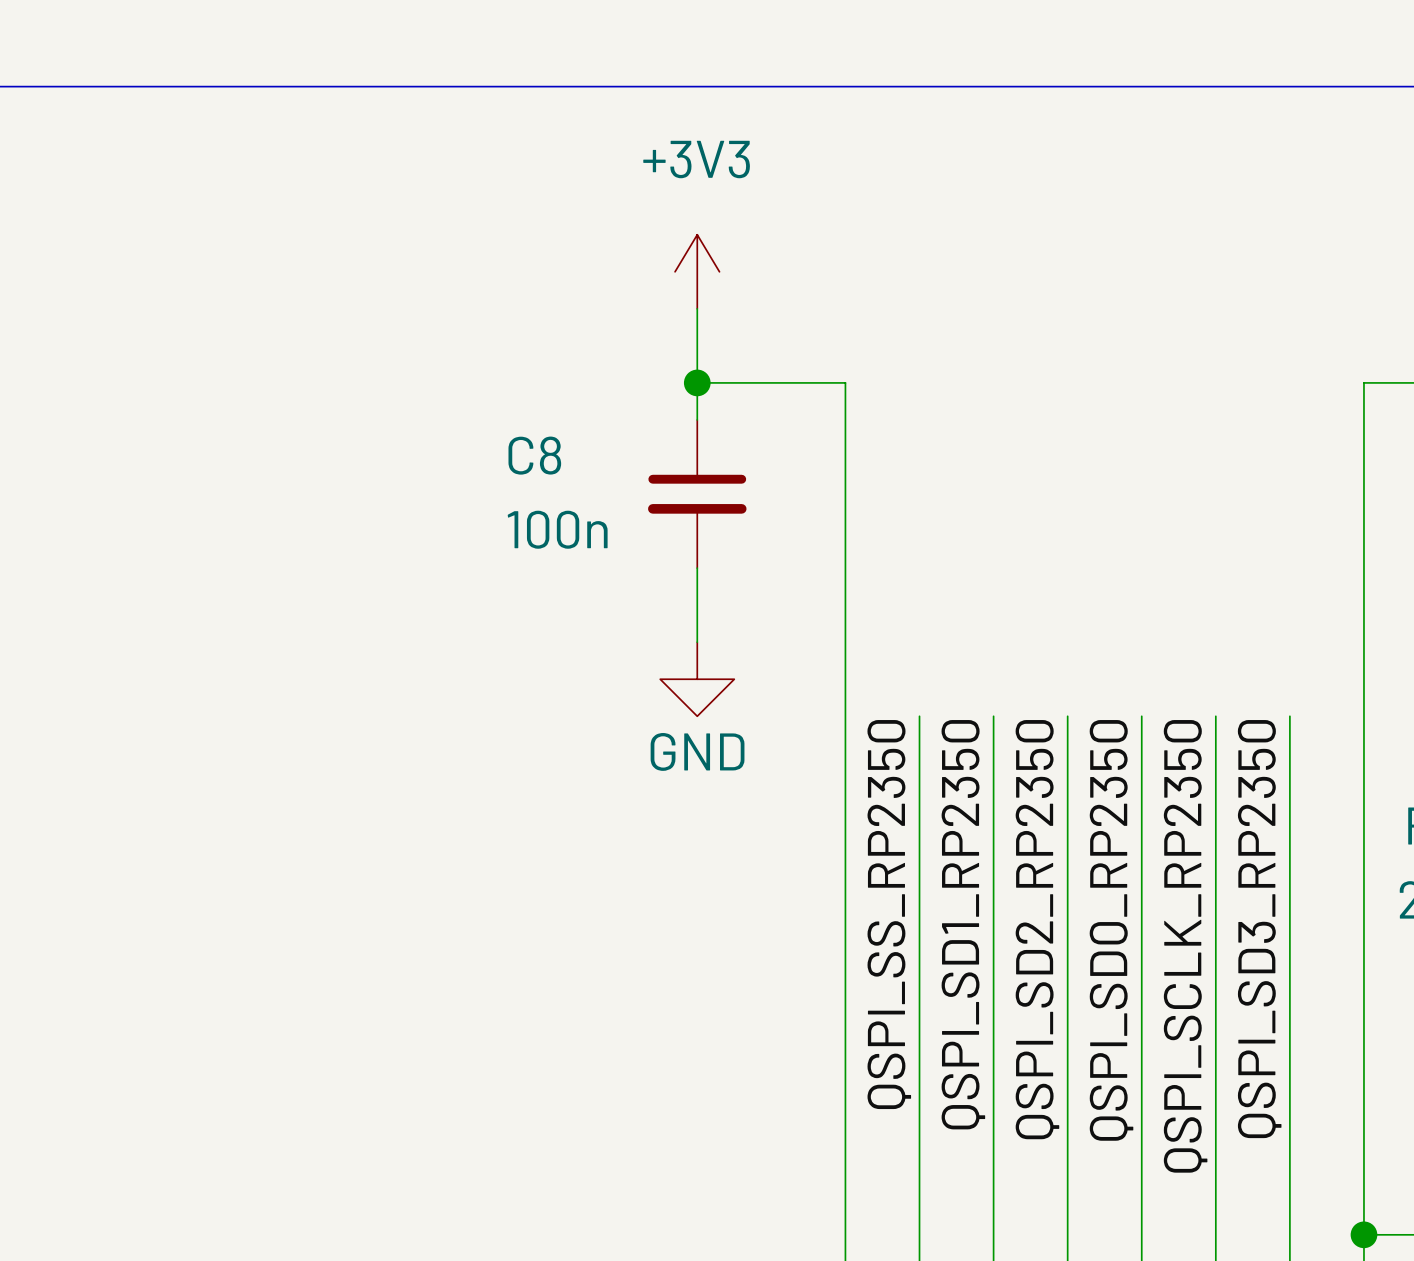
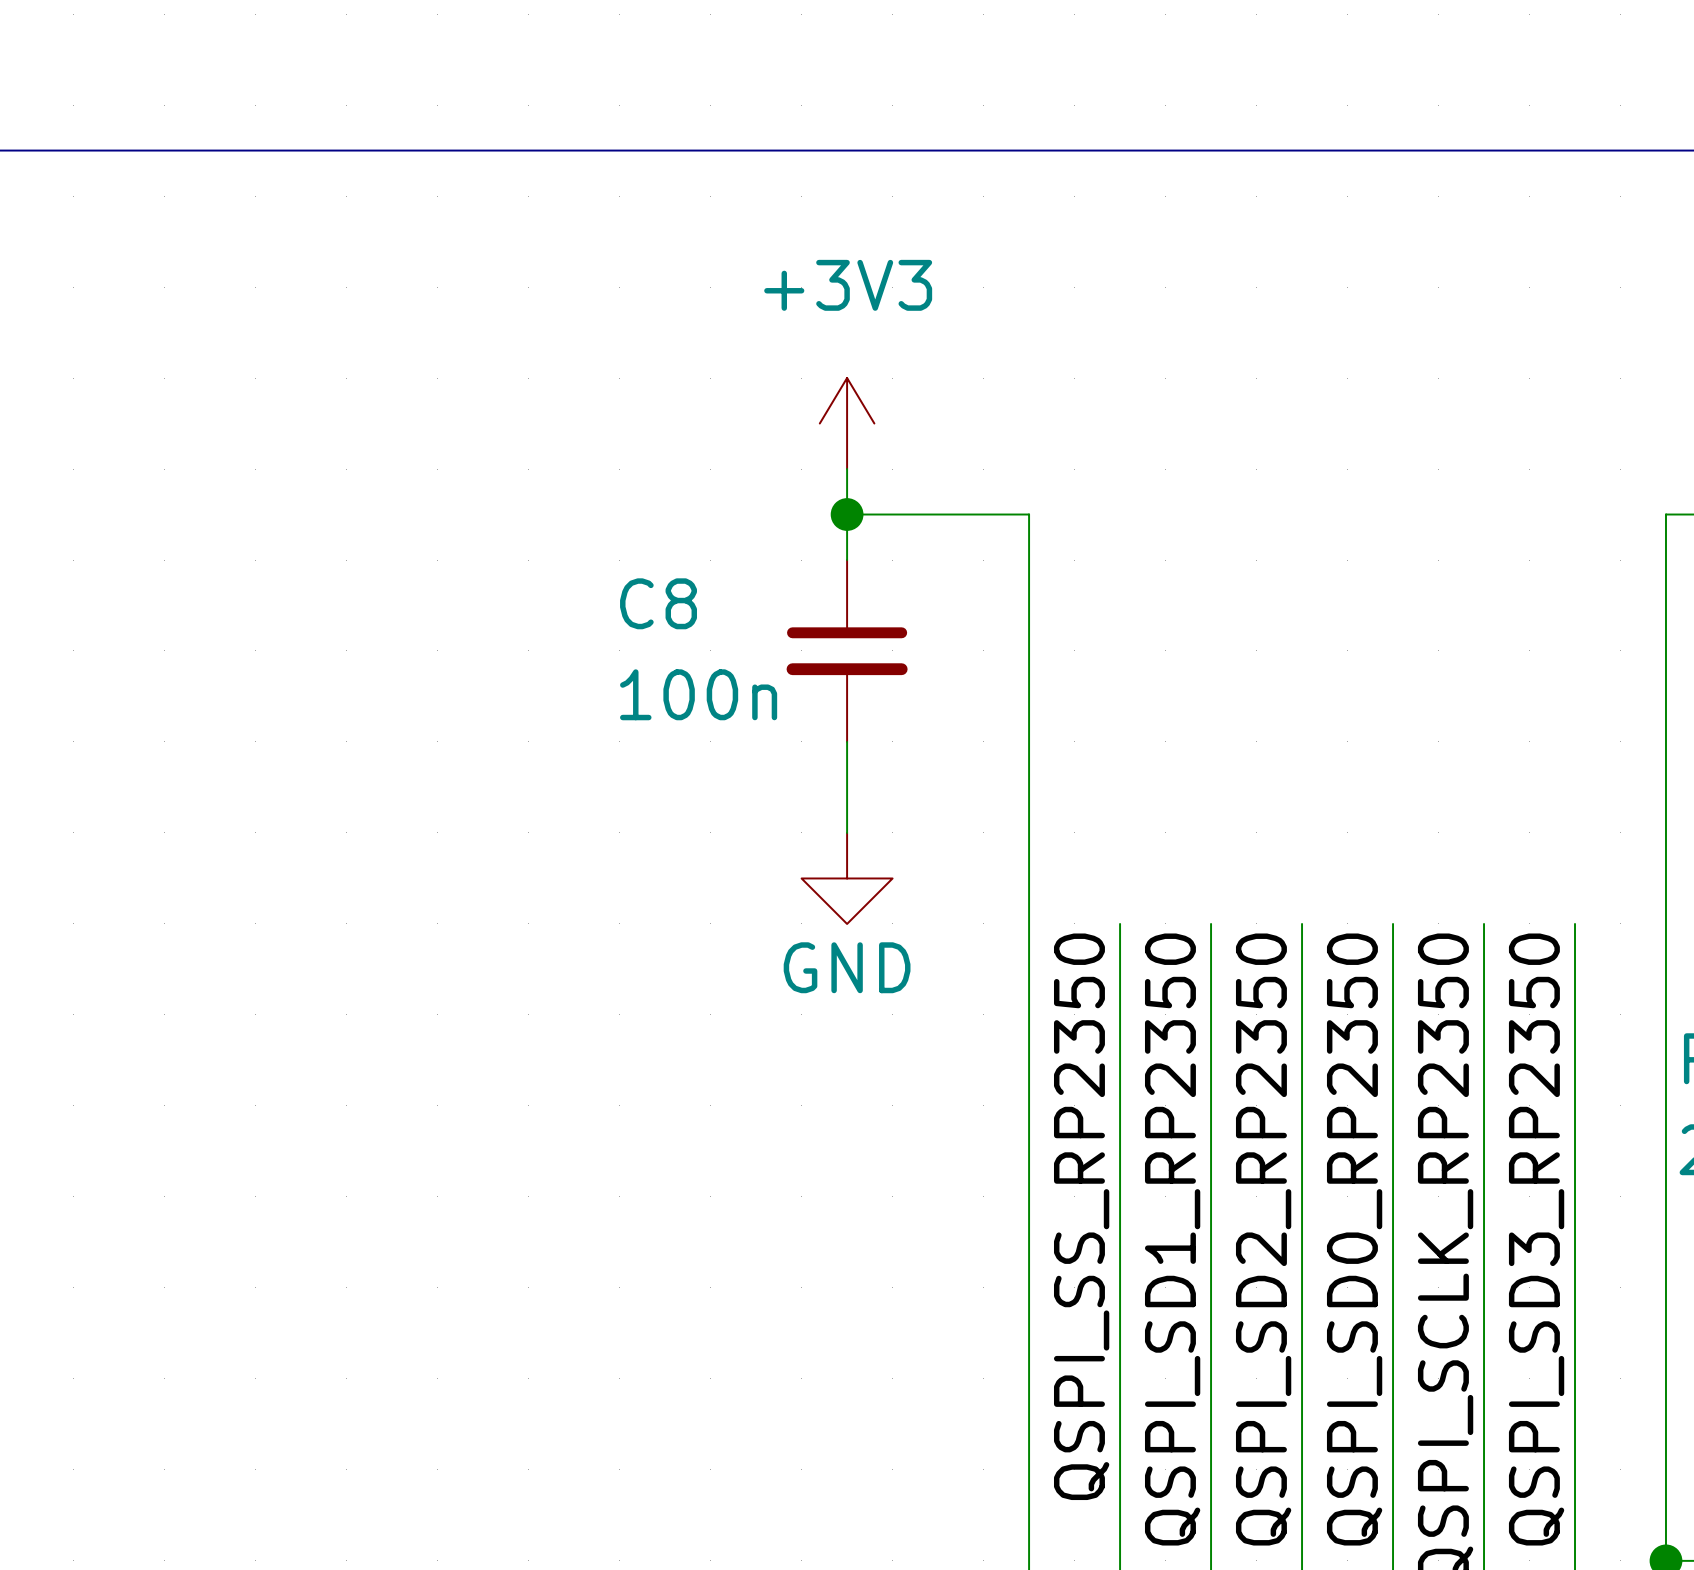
power symbol position: +3V3 (697, 271) -> +3V3 (847, 423)

